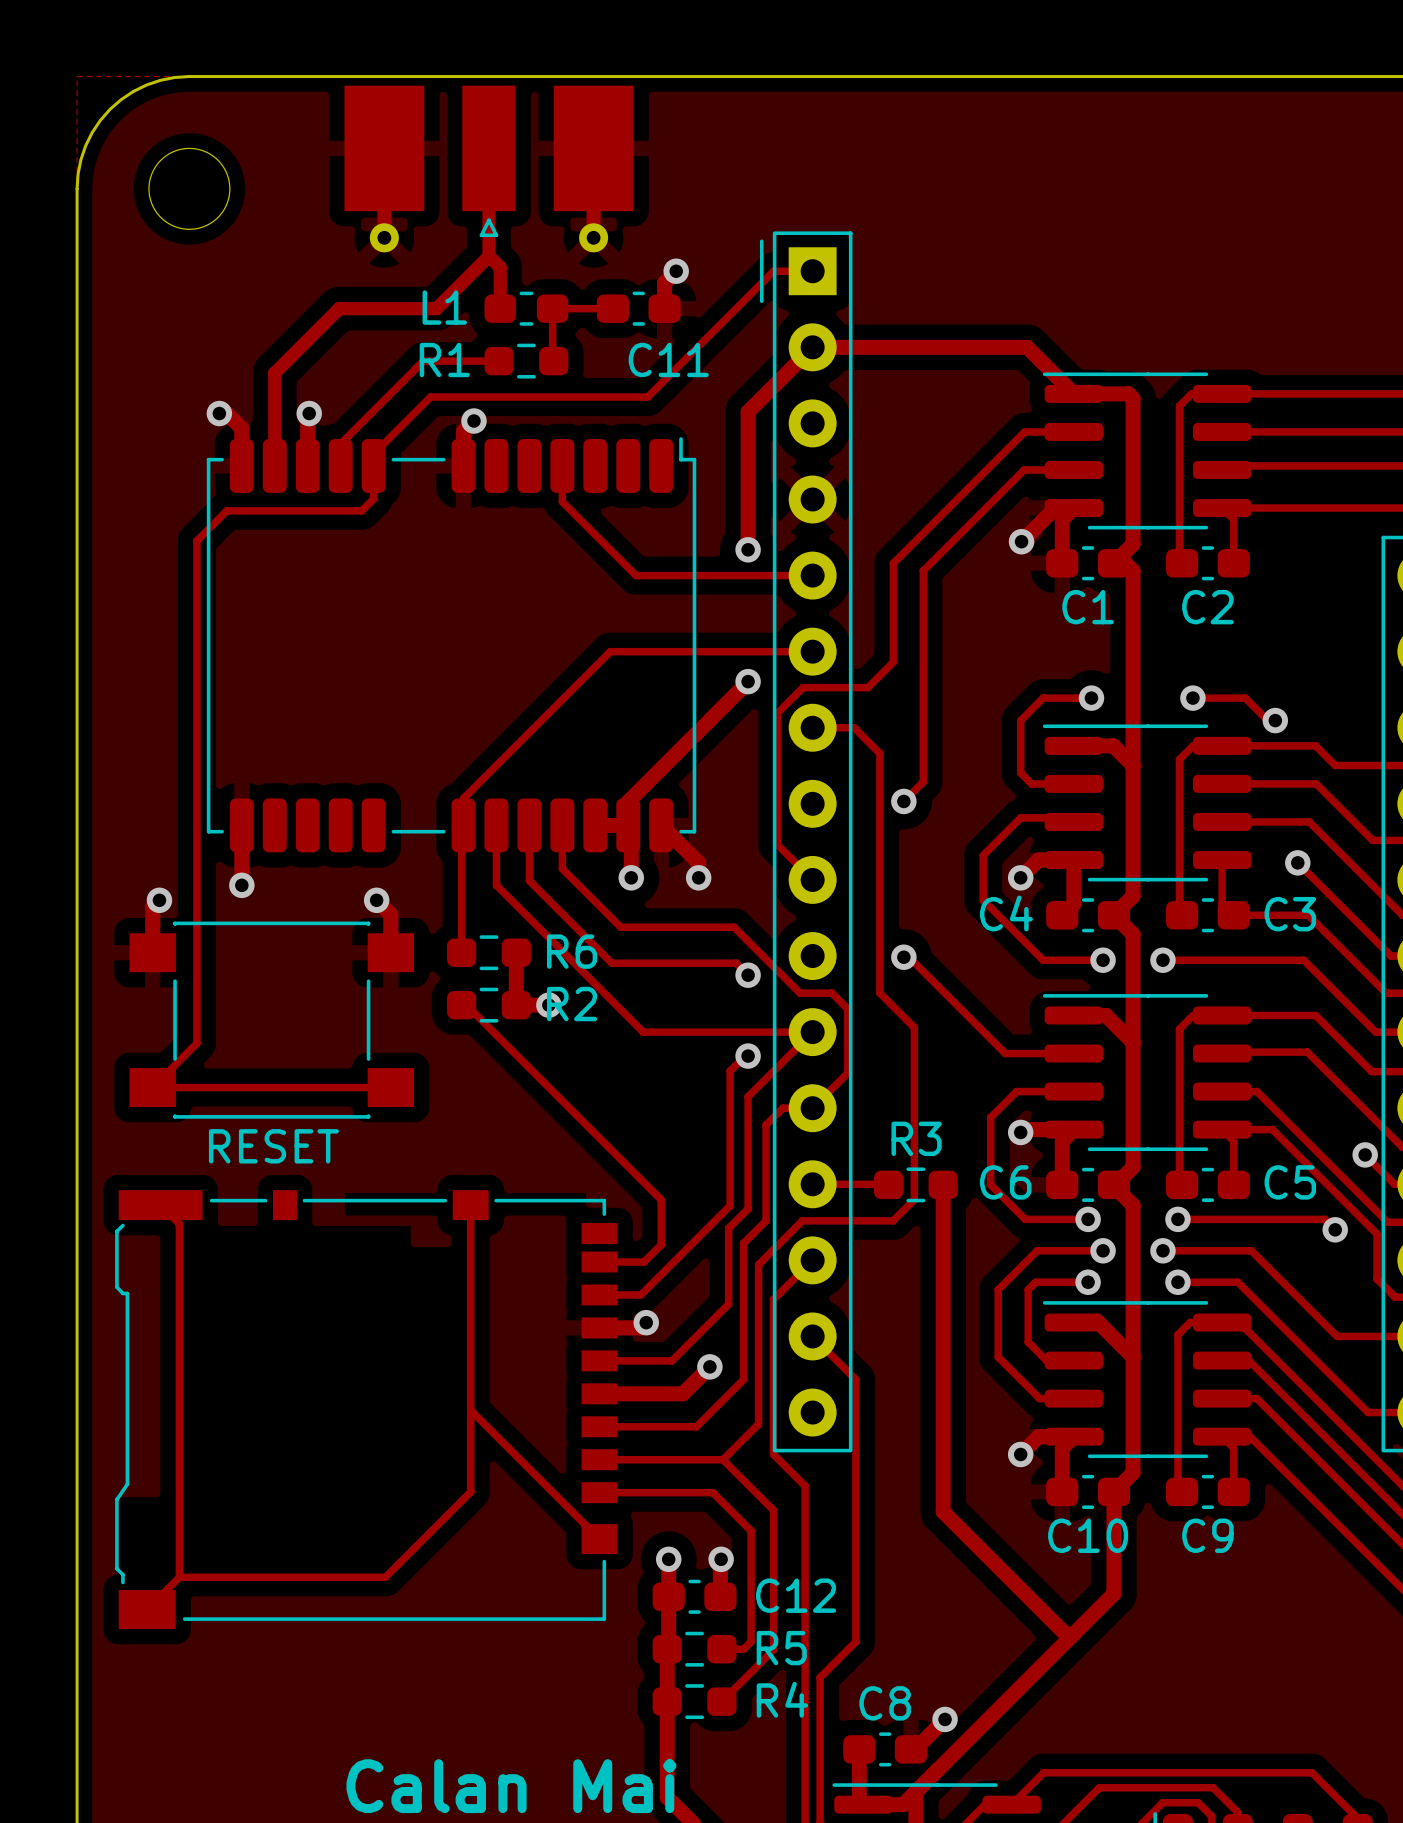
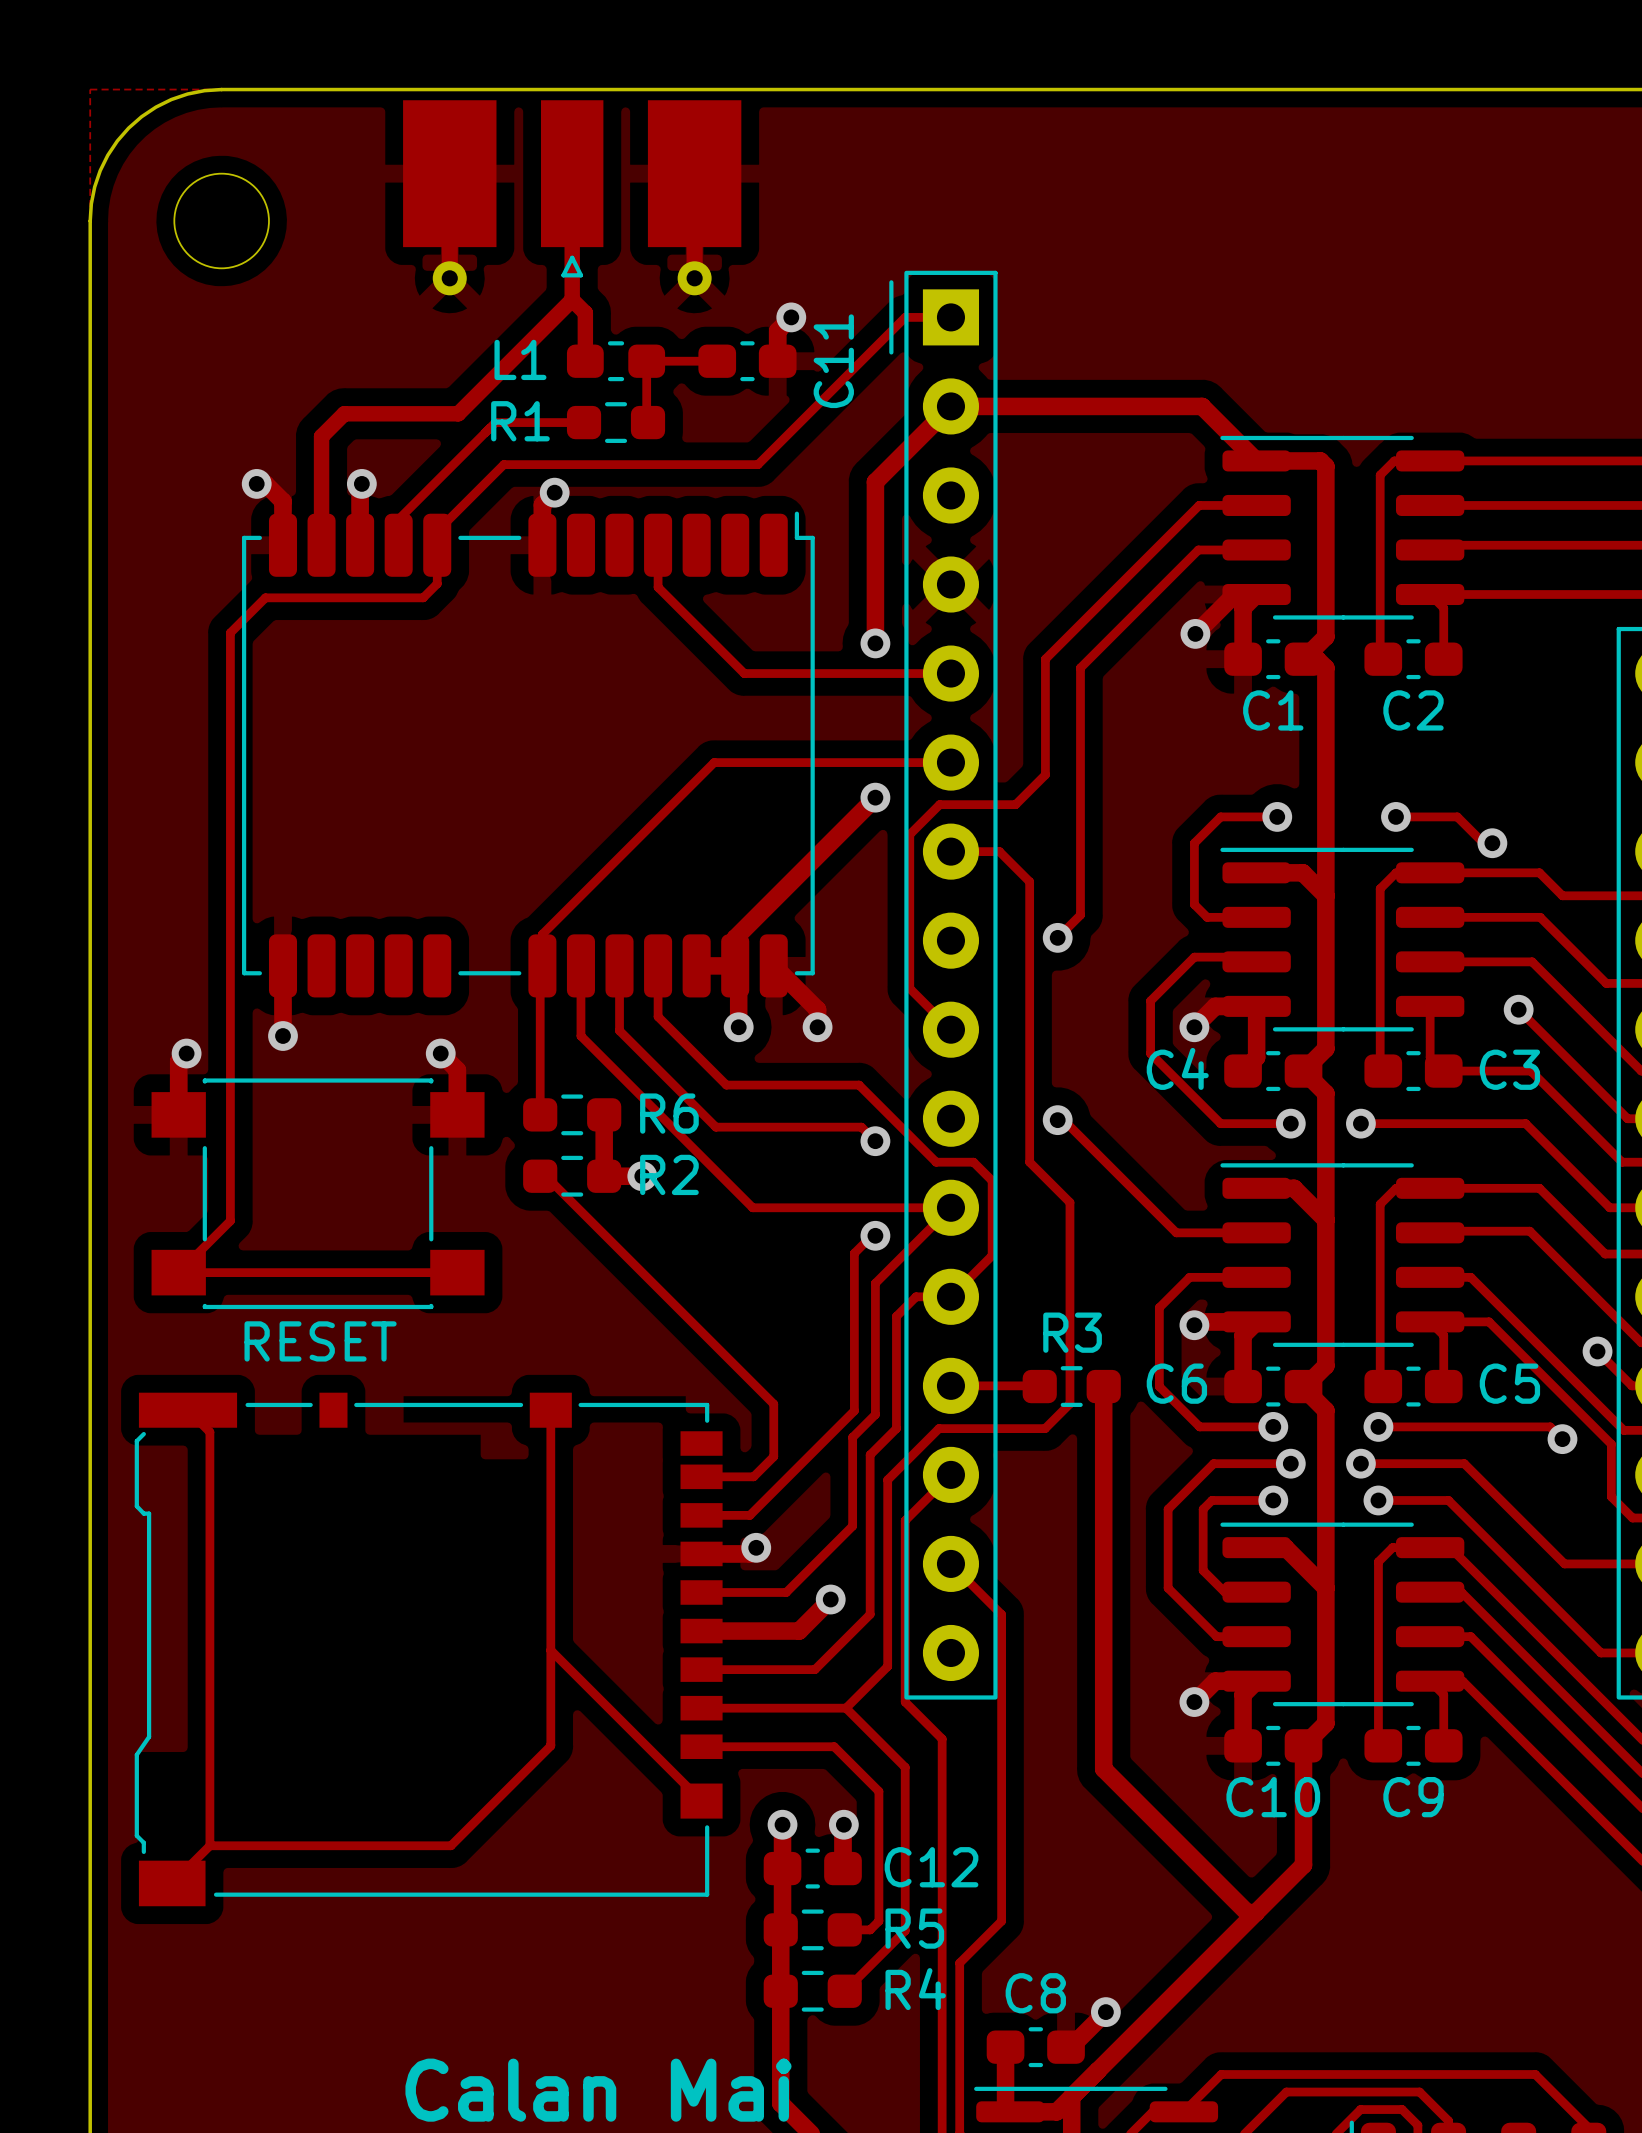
track: (436, 308) (339, 308) (294, 353) -> (510, 361) (458, 413) (344, 413)
C11 name rotation: 0° (668, 359) -> 90° counterclockwise (833, 361)

